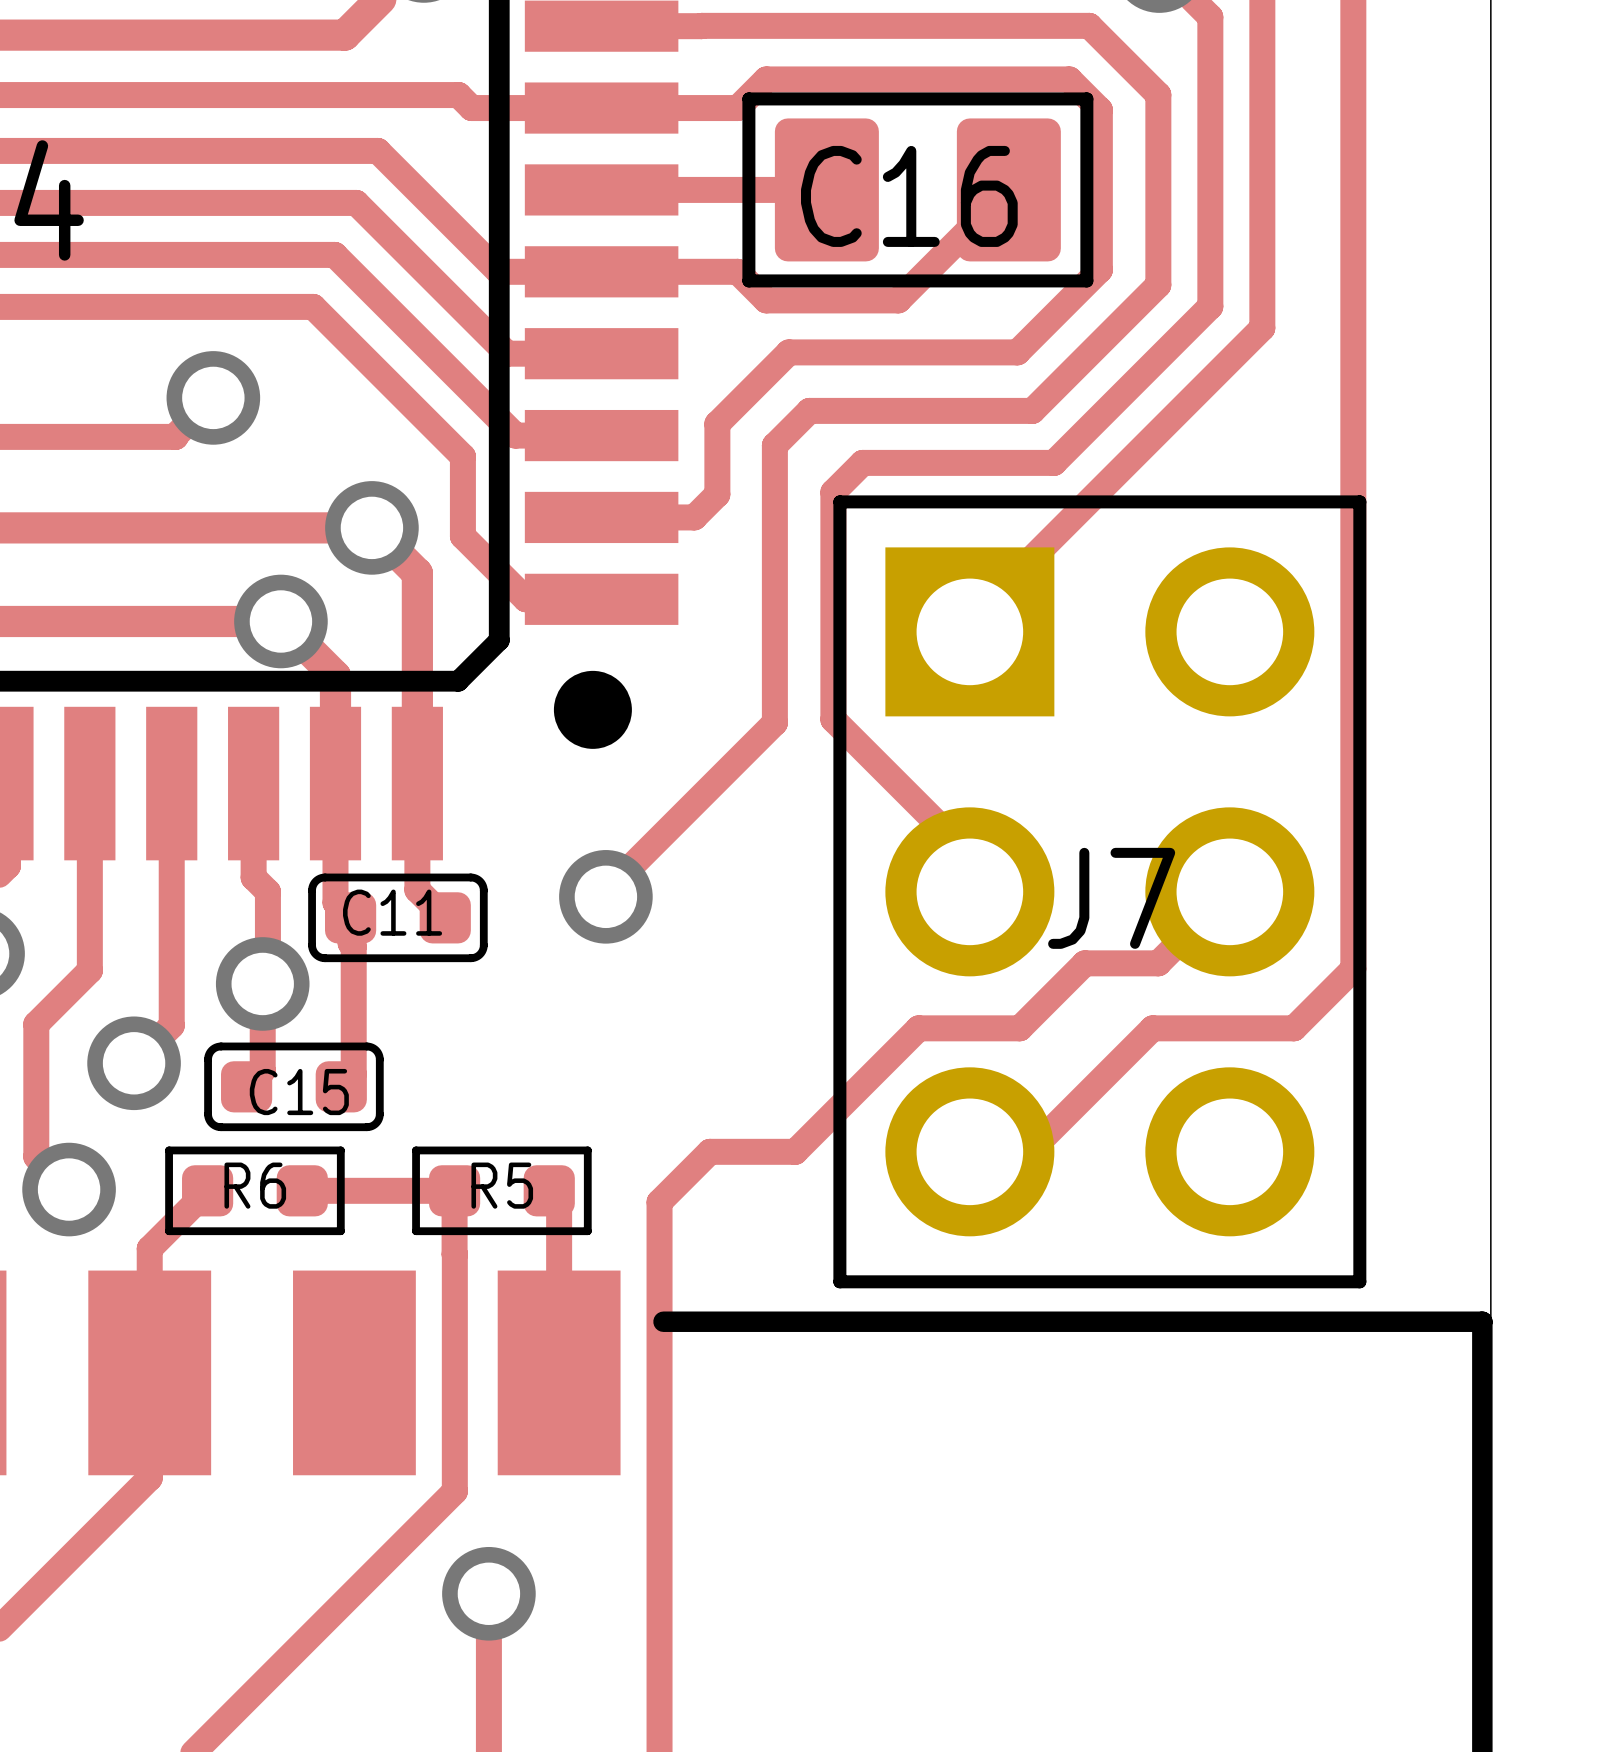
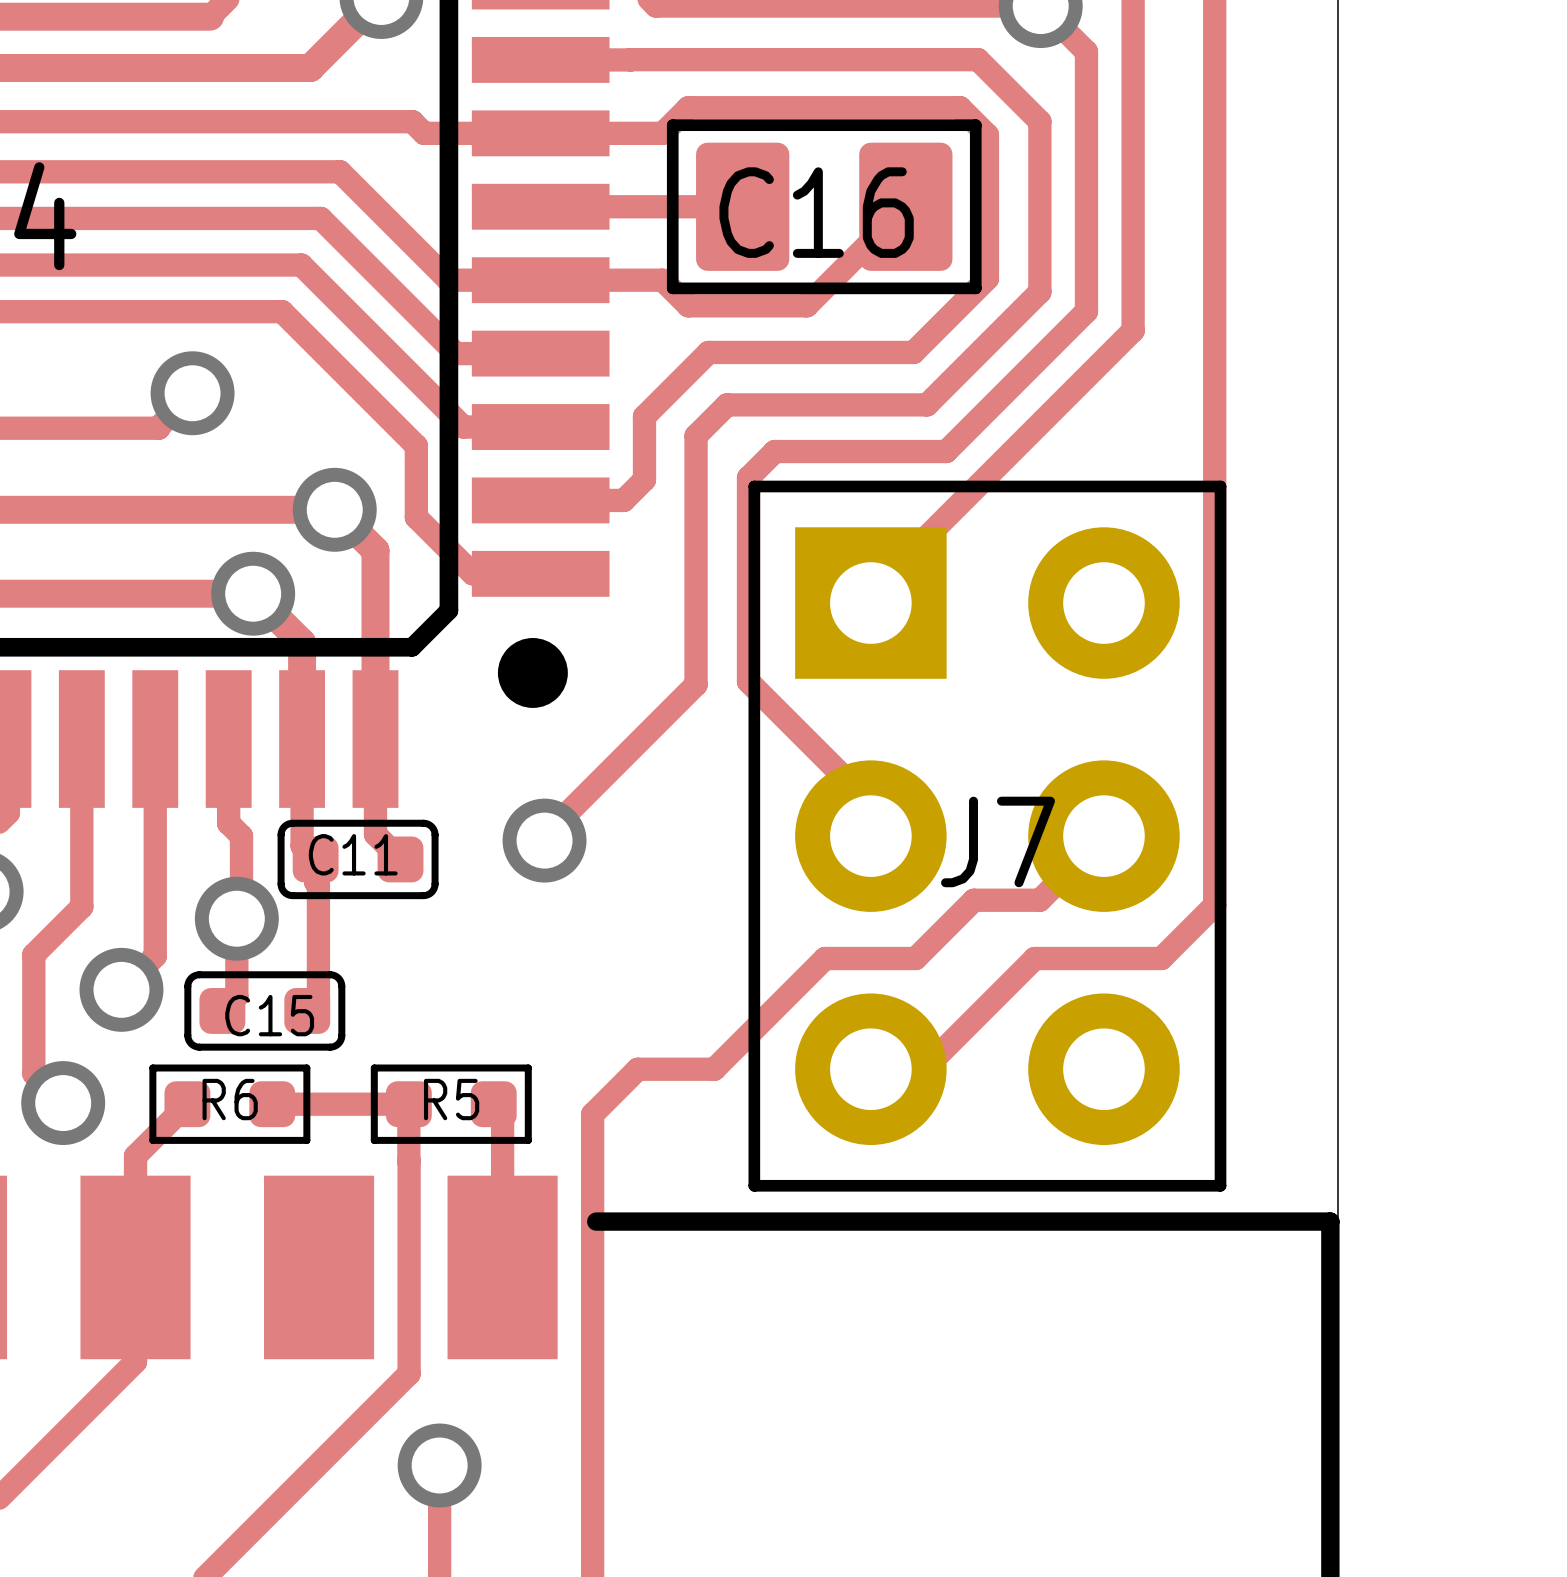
J7 footprint: [833, 495, 1367, 1289] -> [748, 480, 1227, 1192]

